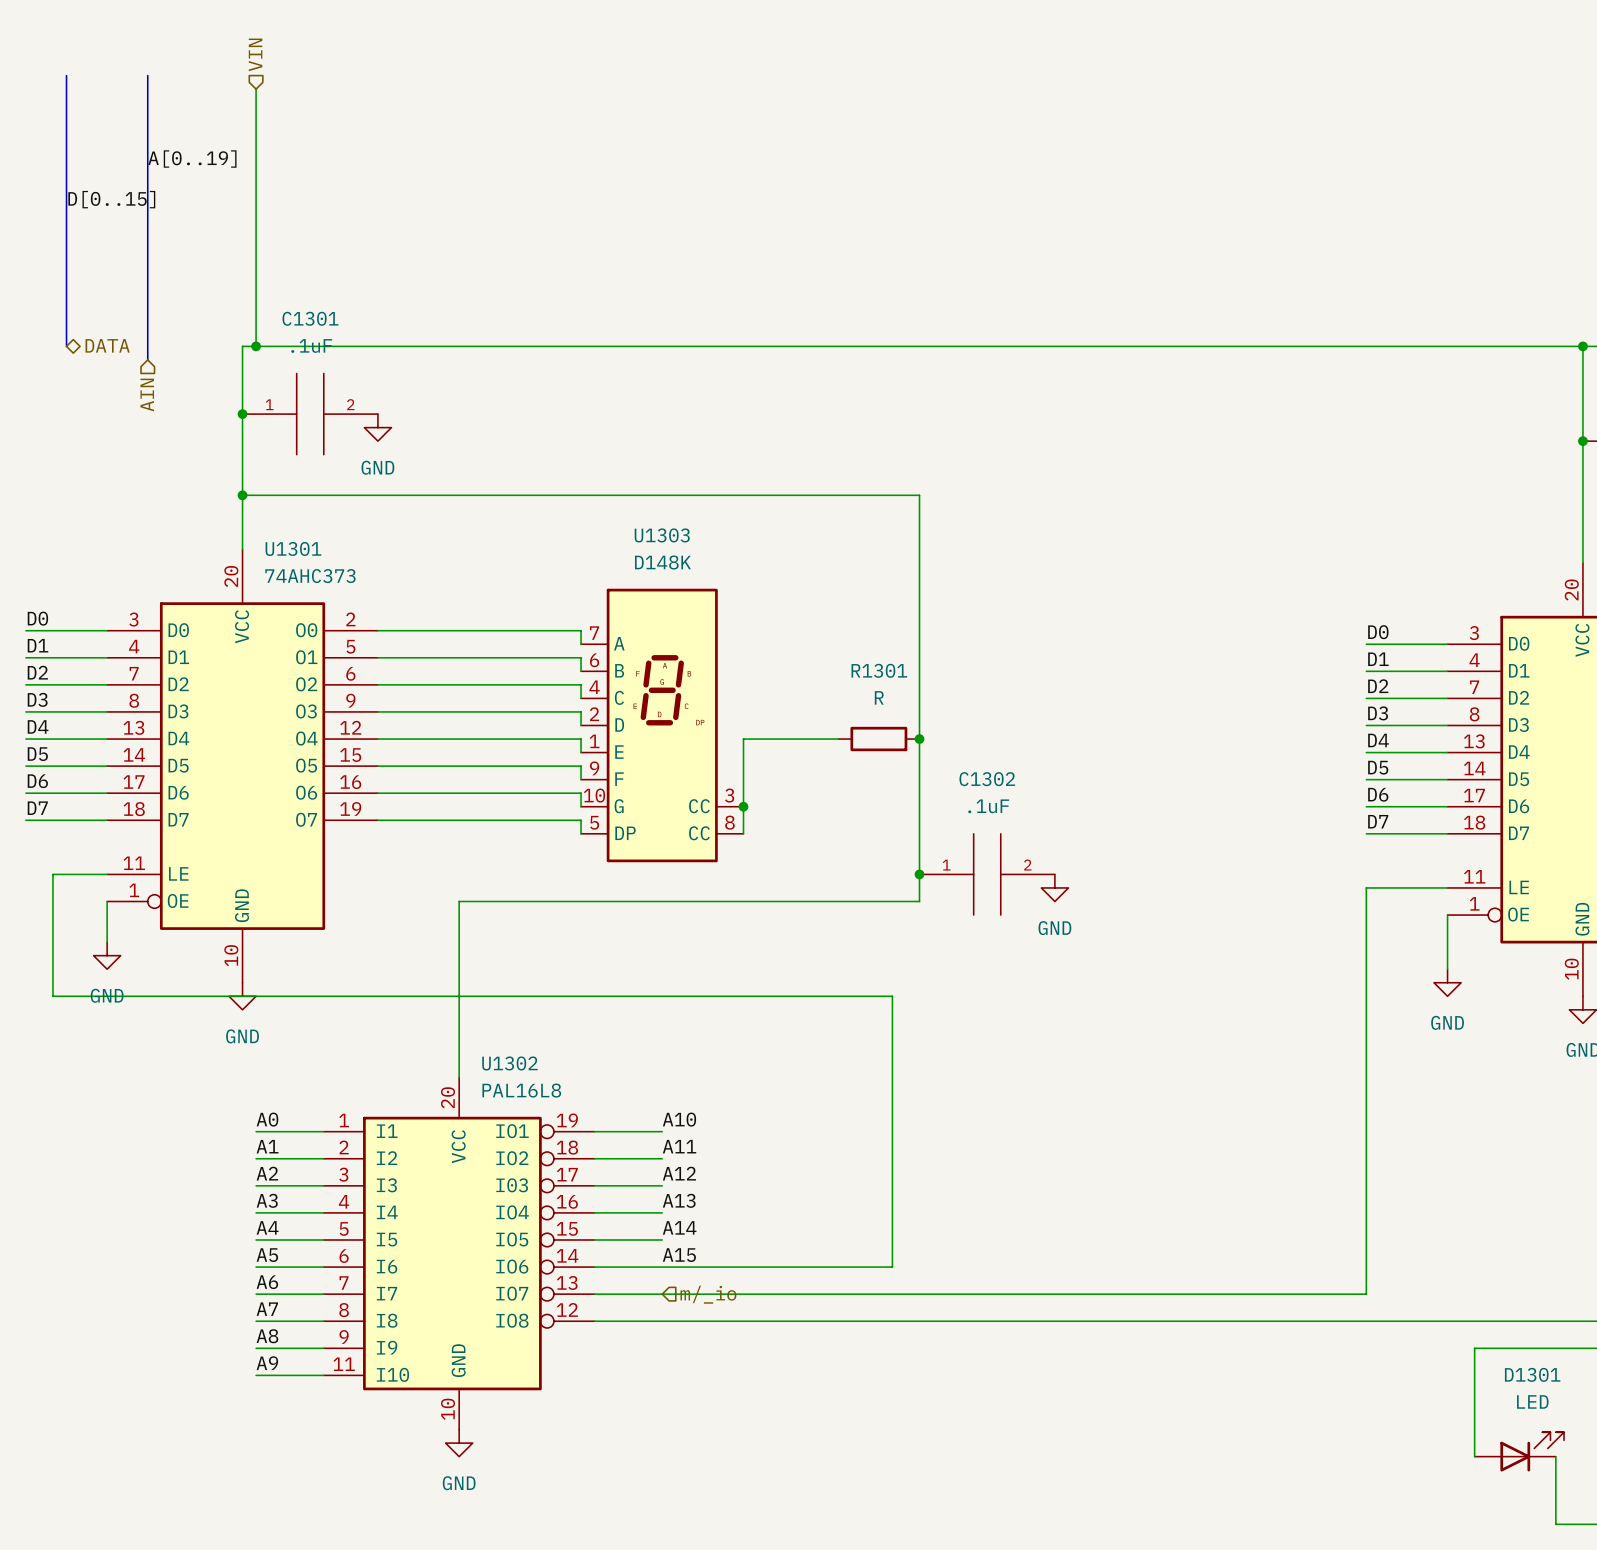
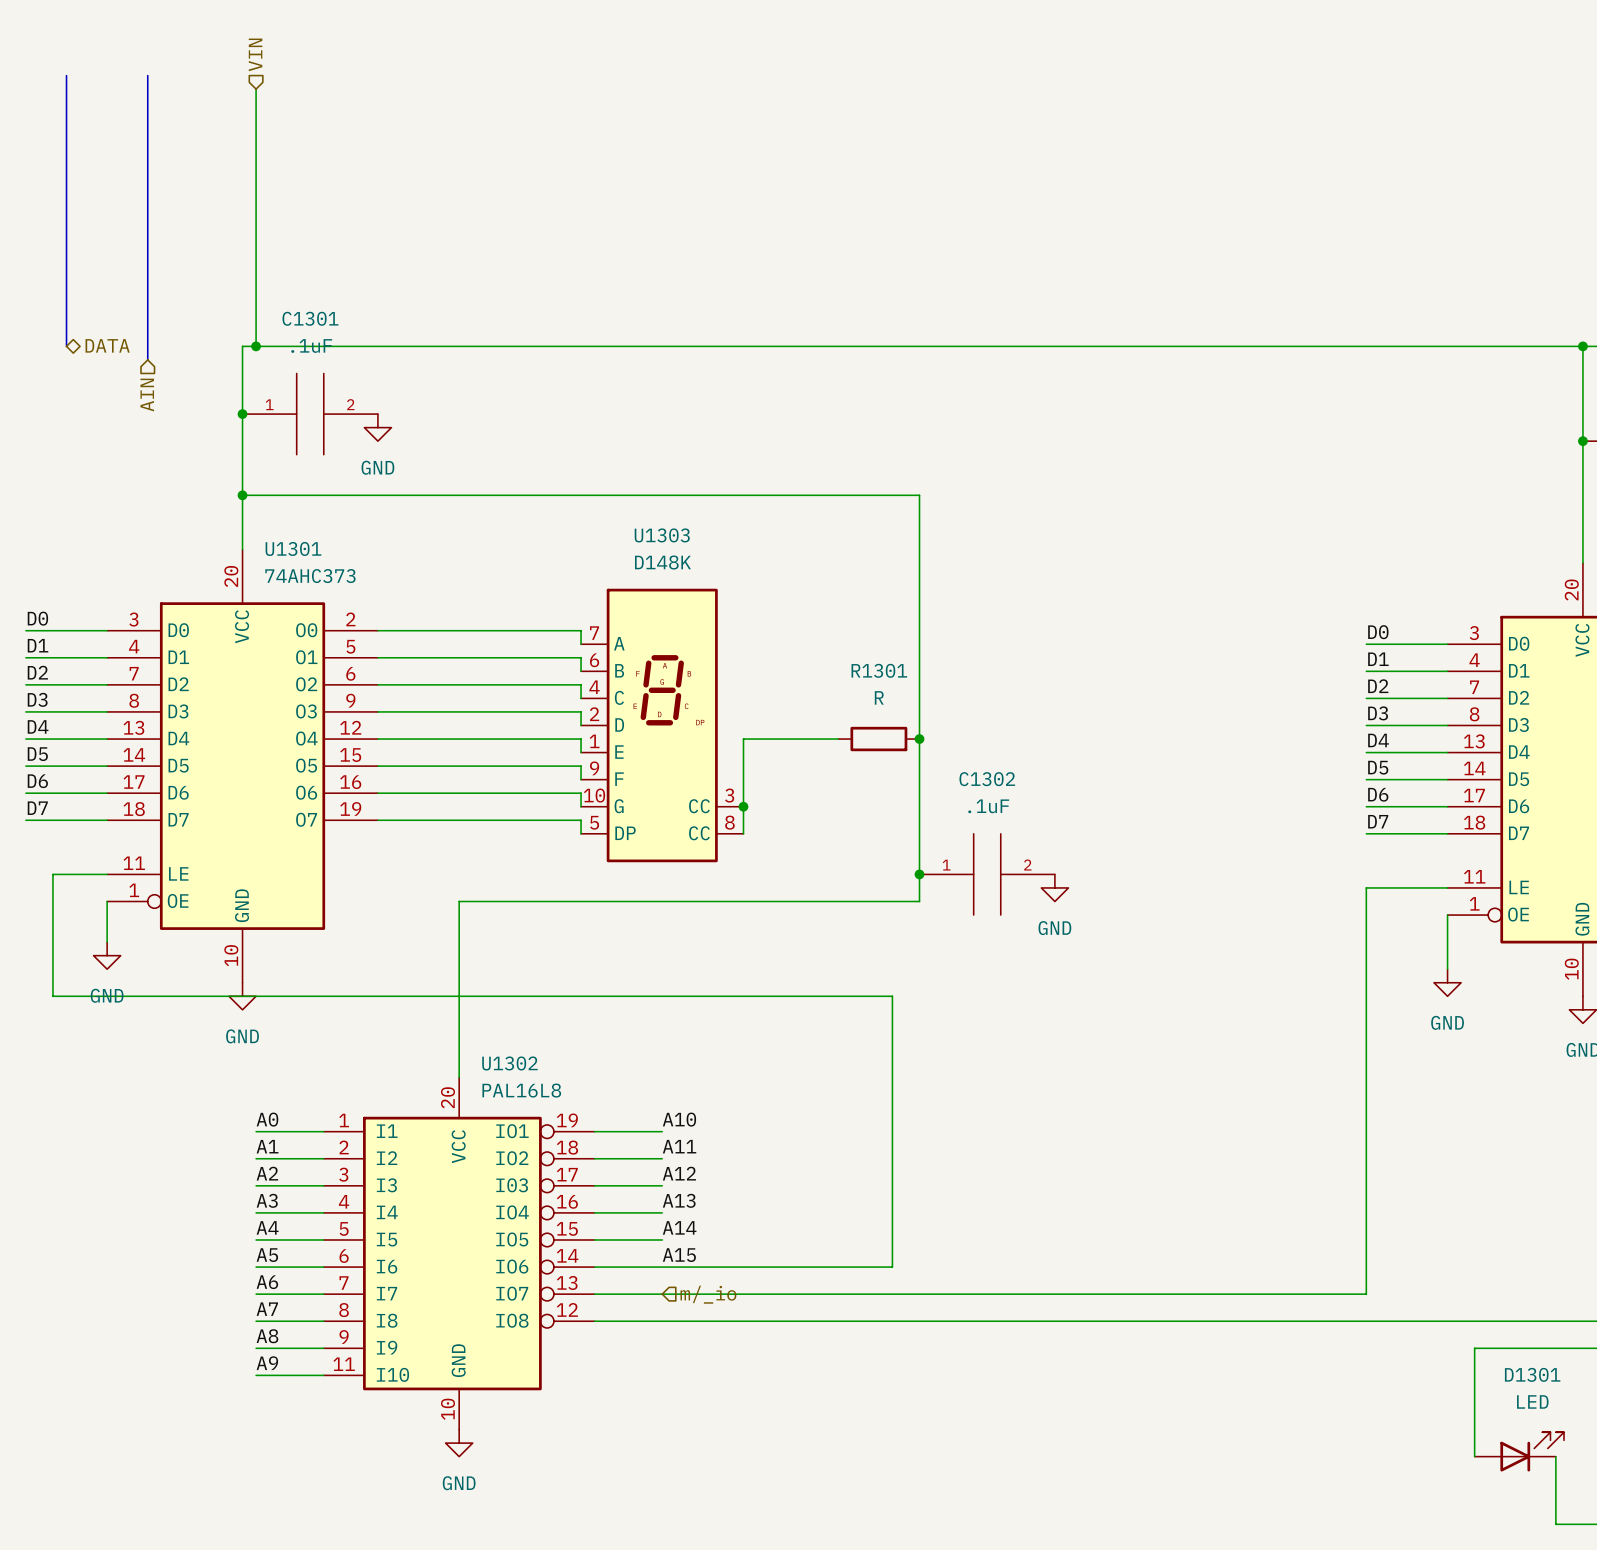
label: A[0..19] (192, 159) -> none
label: D[0..15] (111, 199) -> none

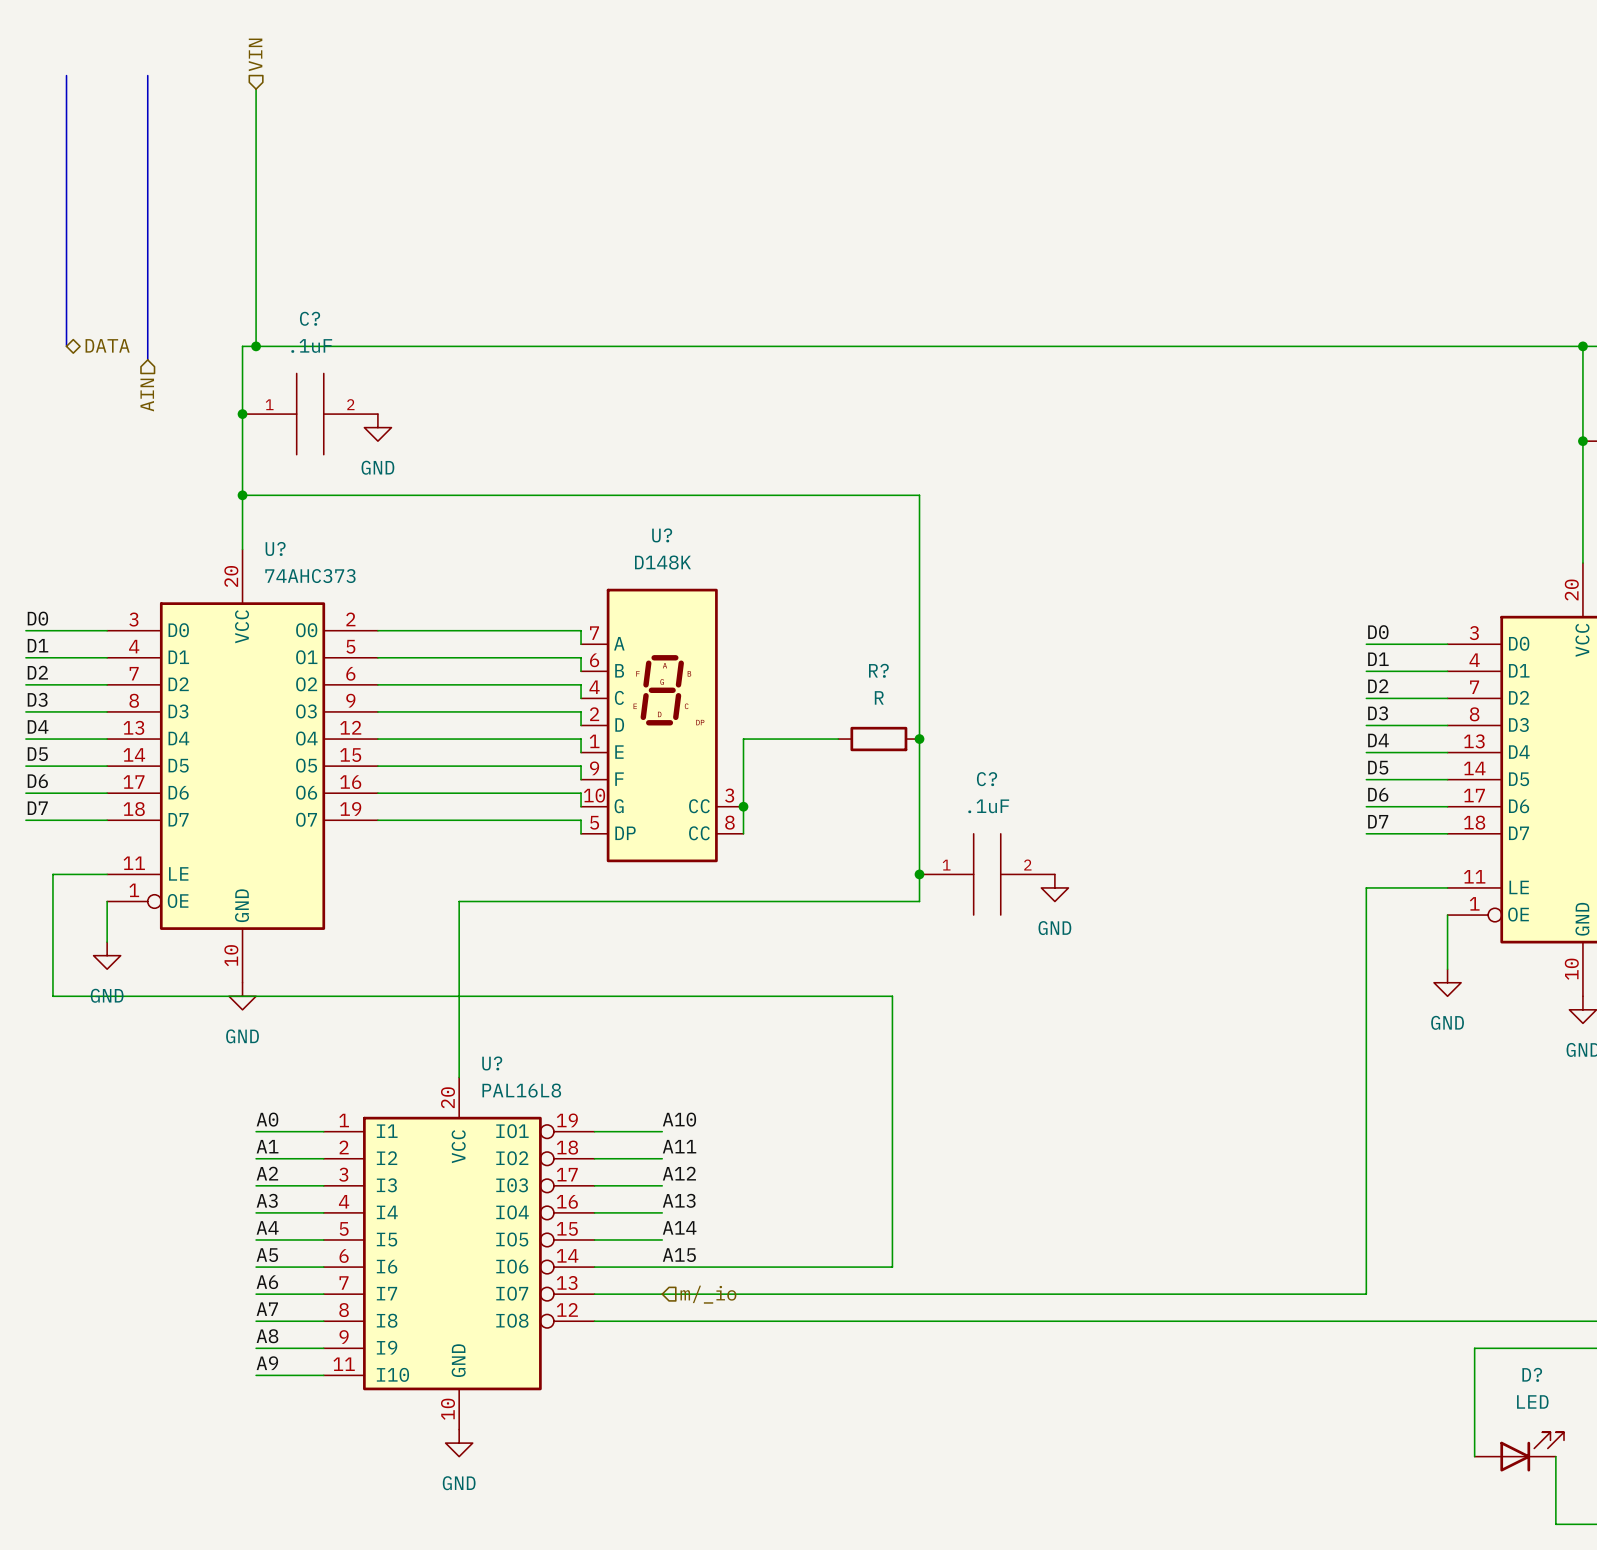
C1301 name: C1301 (310, 318) -> C? (310, 318)
U1303 name: U1303 (662, 535) -> U? (662, 535)
U1301 name: U1301 (293, 548) -> U? (275, 548)
R1301 name: R1301 (879, 670) -> R? (878, 670)
C1302 name: C1302 (987, 779) -> C? (987, 779)
U1302 name: U1302 (509, 1063) -> U? (492, 1063)
D1301 name: D1301 (1532, 1374) -> D? (1532, 1374)

